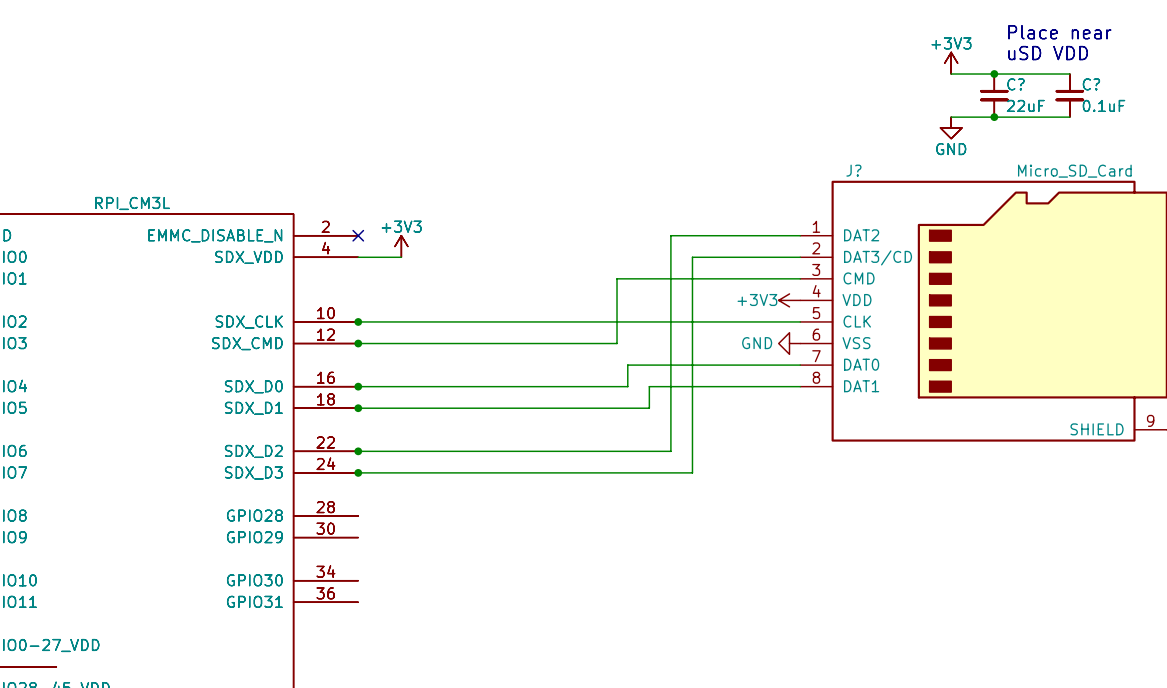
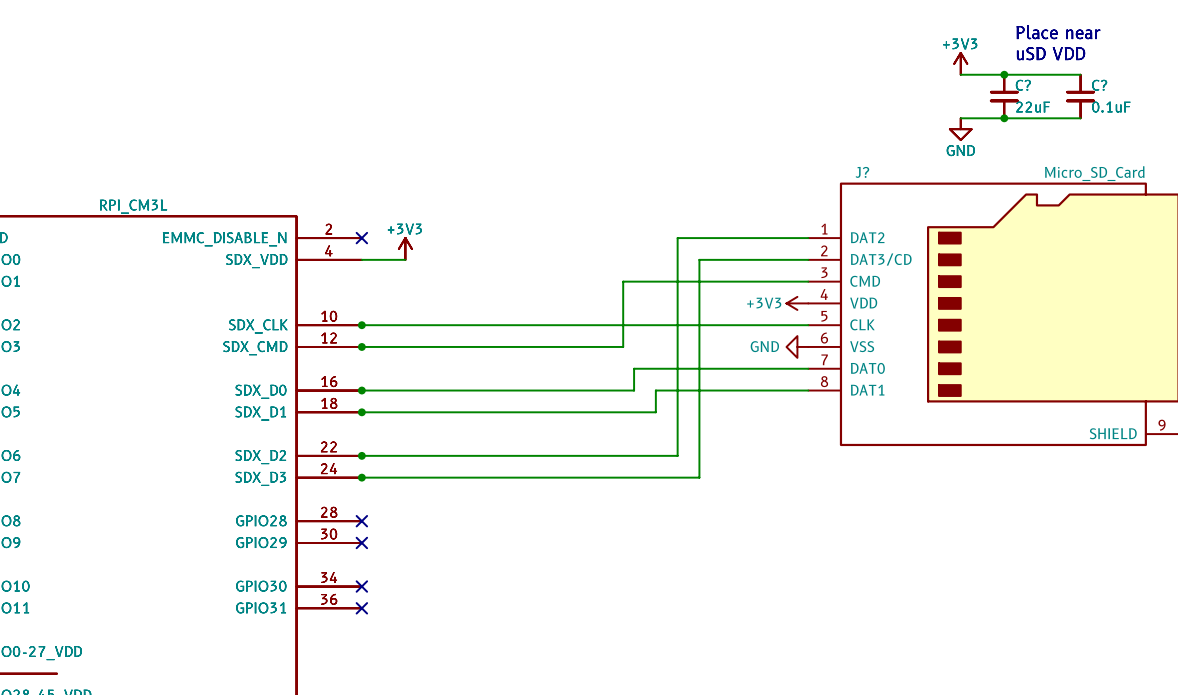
no-connect mark: none -> (361, 521)
no-connect mark: none -> (361, 542)
no-connect mark: none -> (361, 586)
no-connect mark: none -> (361, 608)

